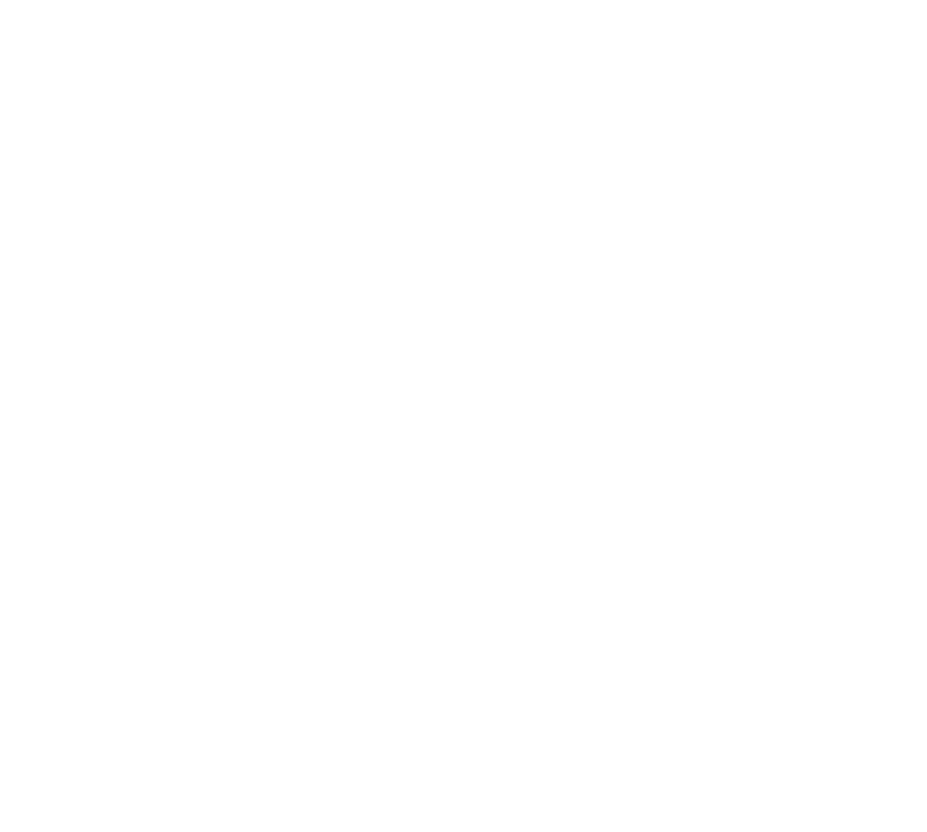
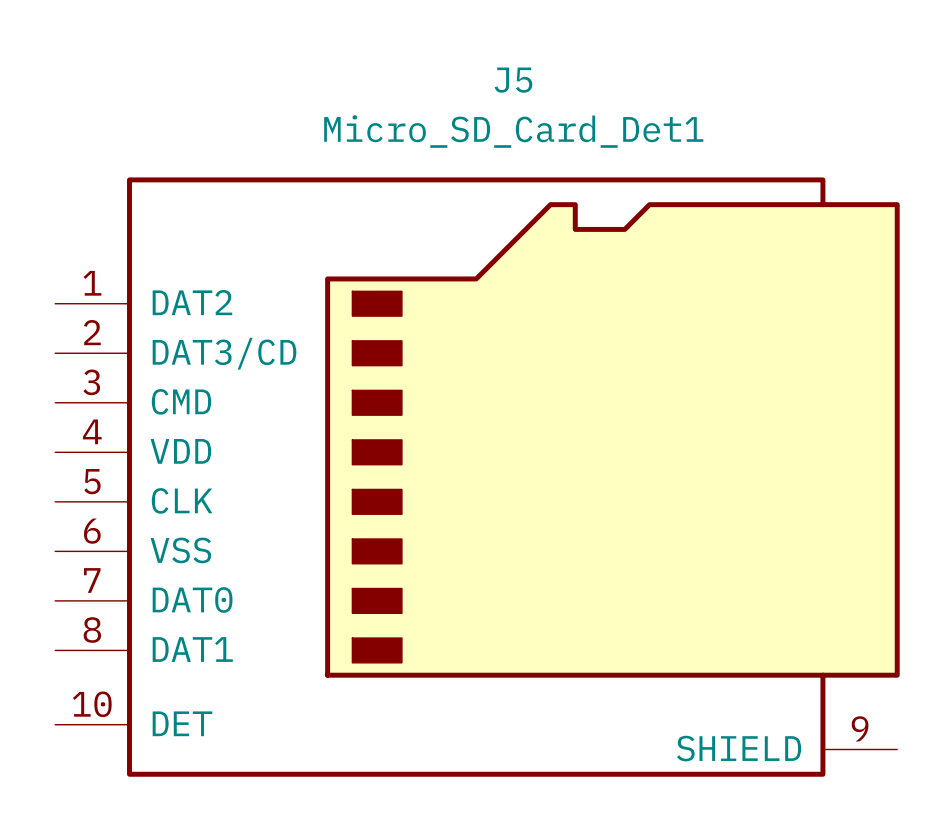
J5: none -> Micro_SD_Card_Det1 (477, 477)

